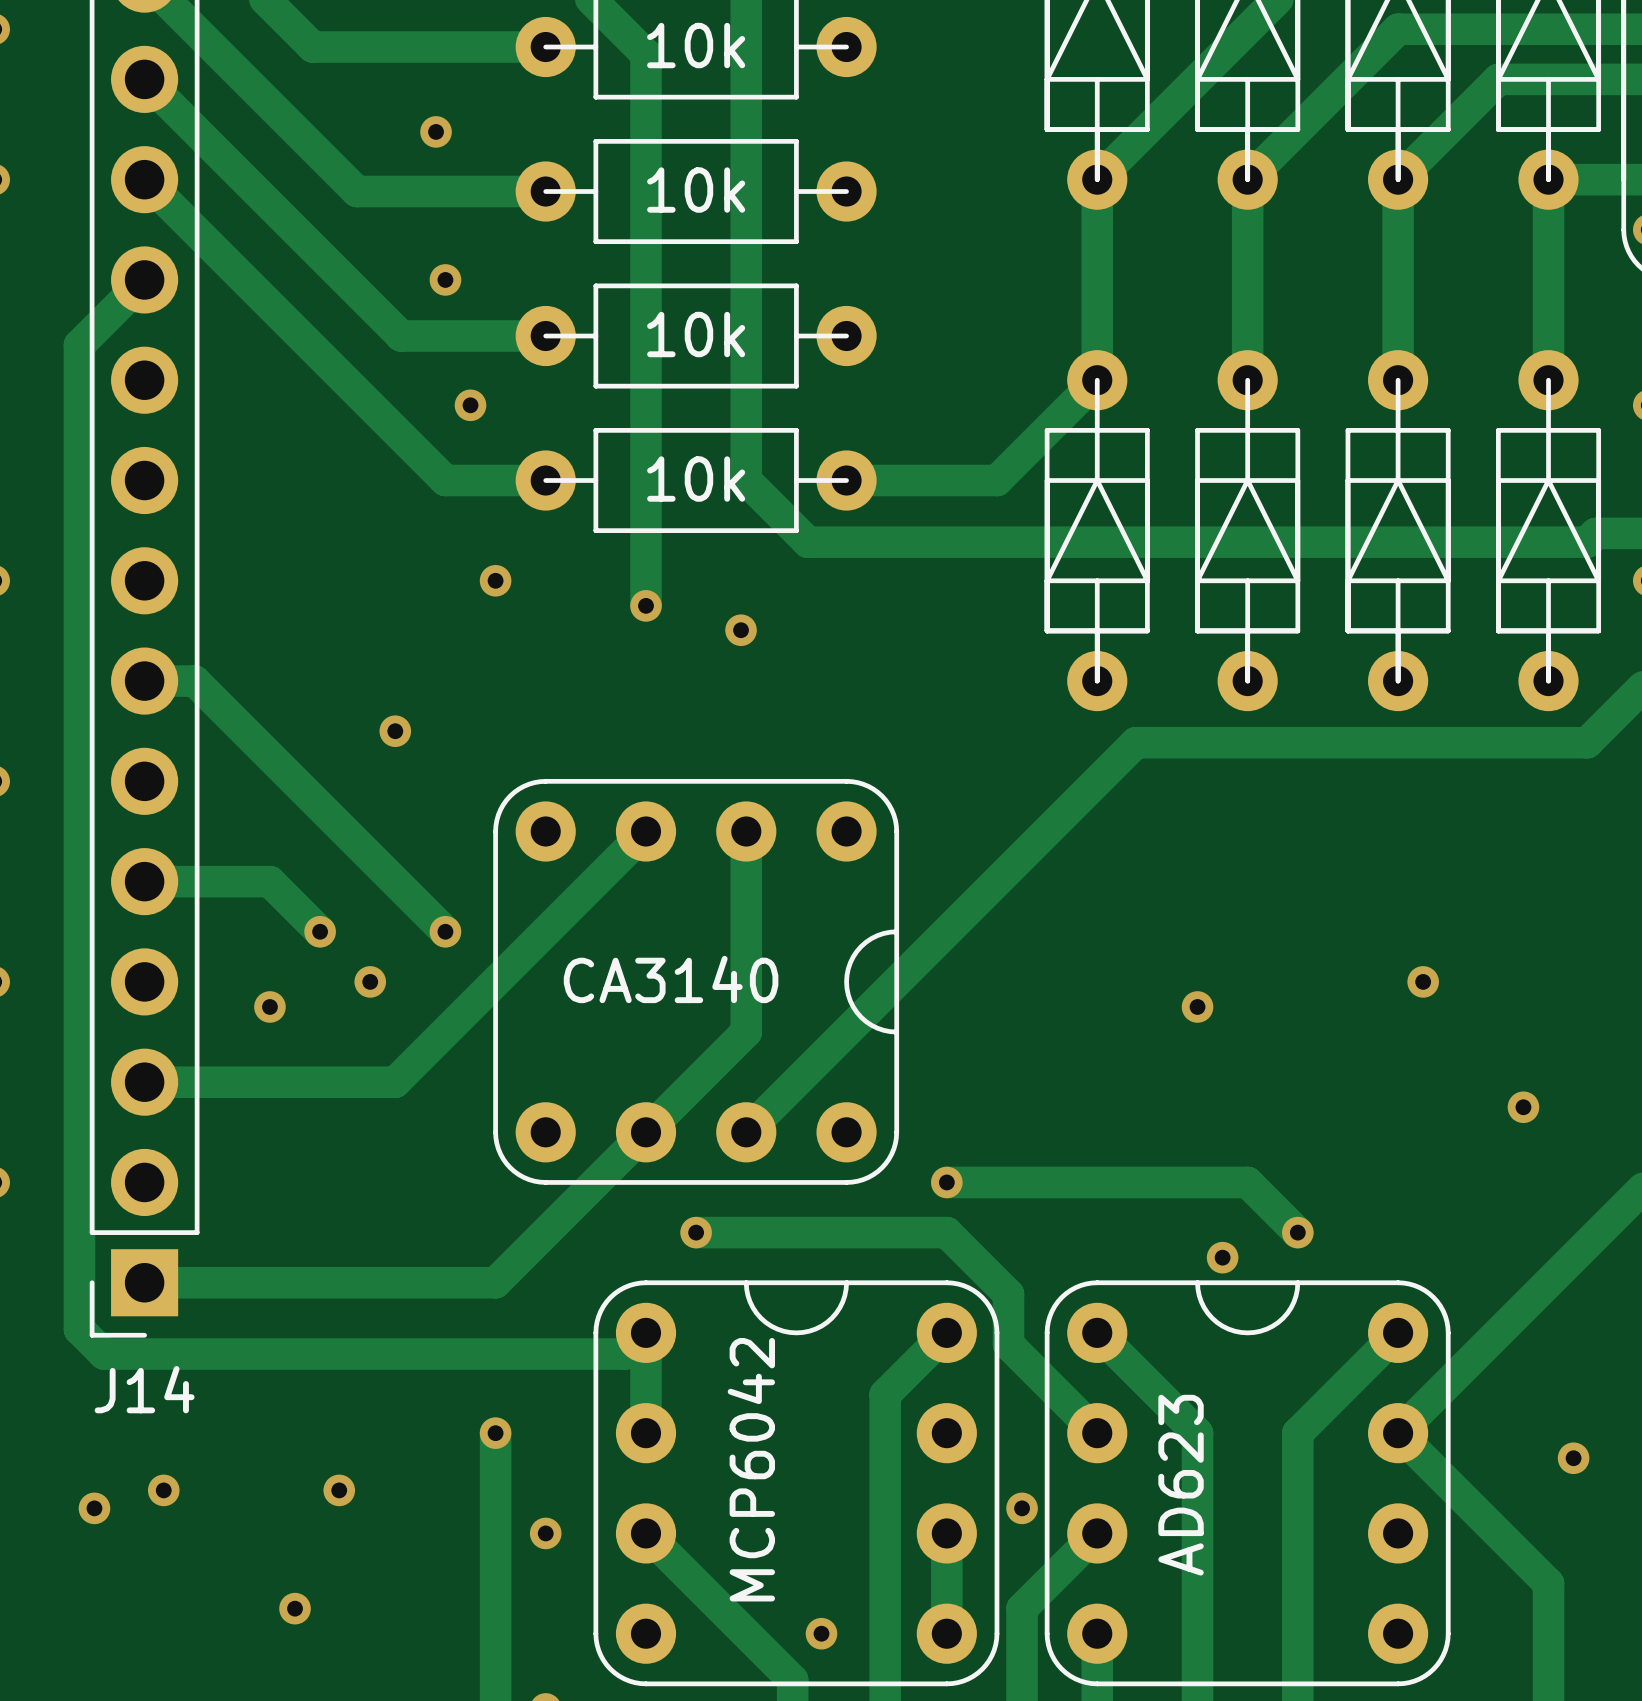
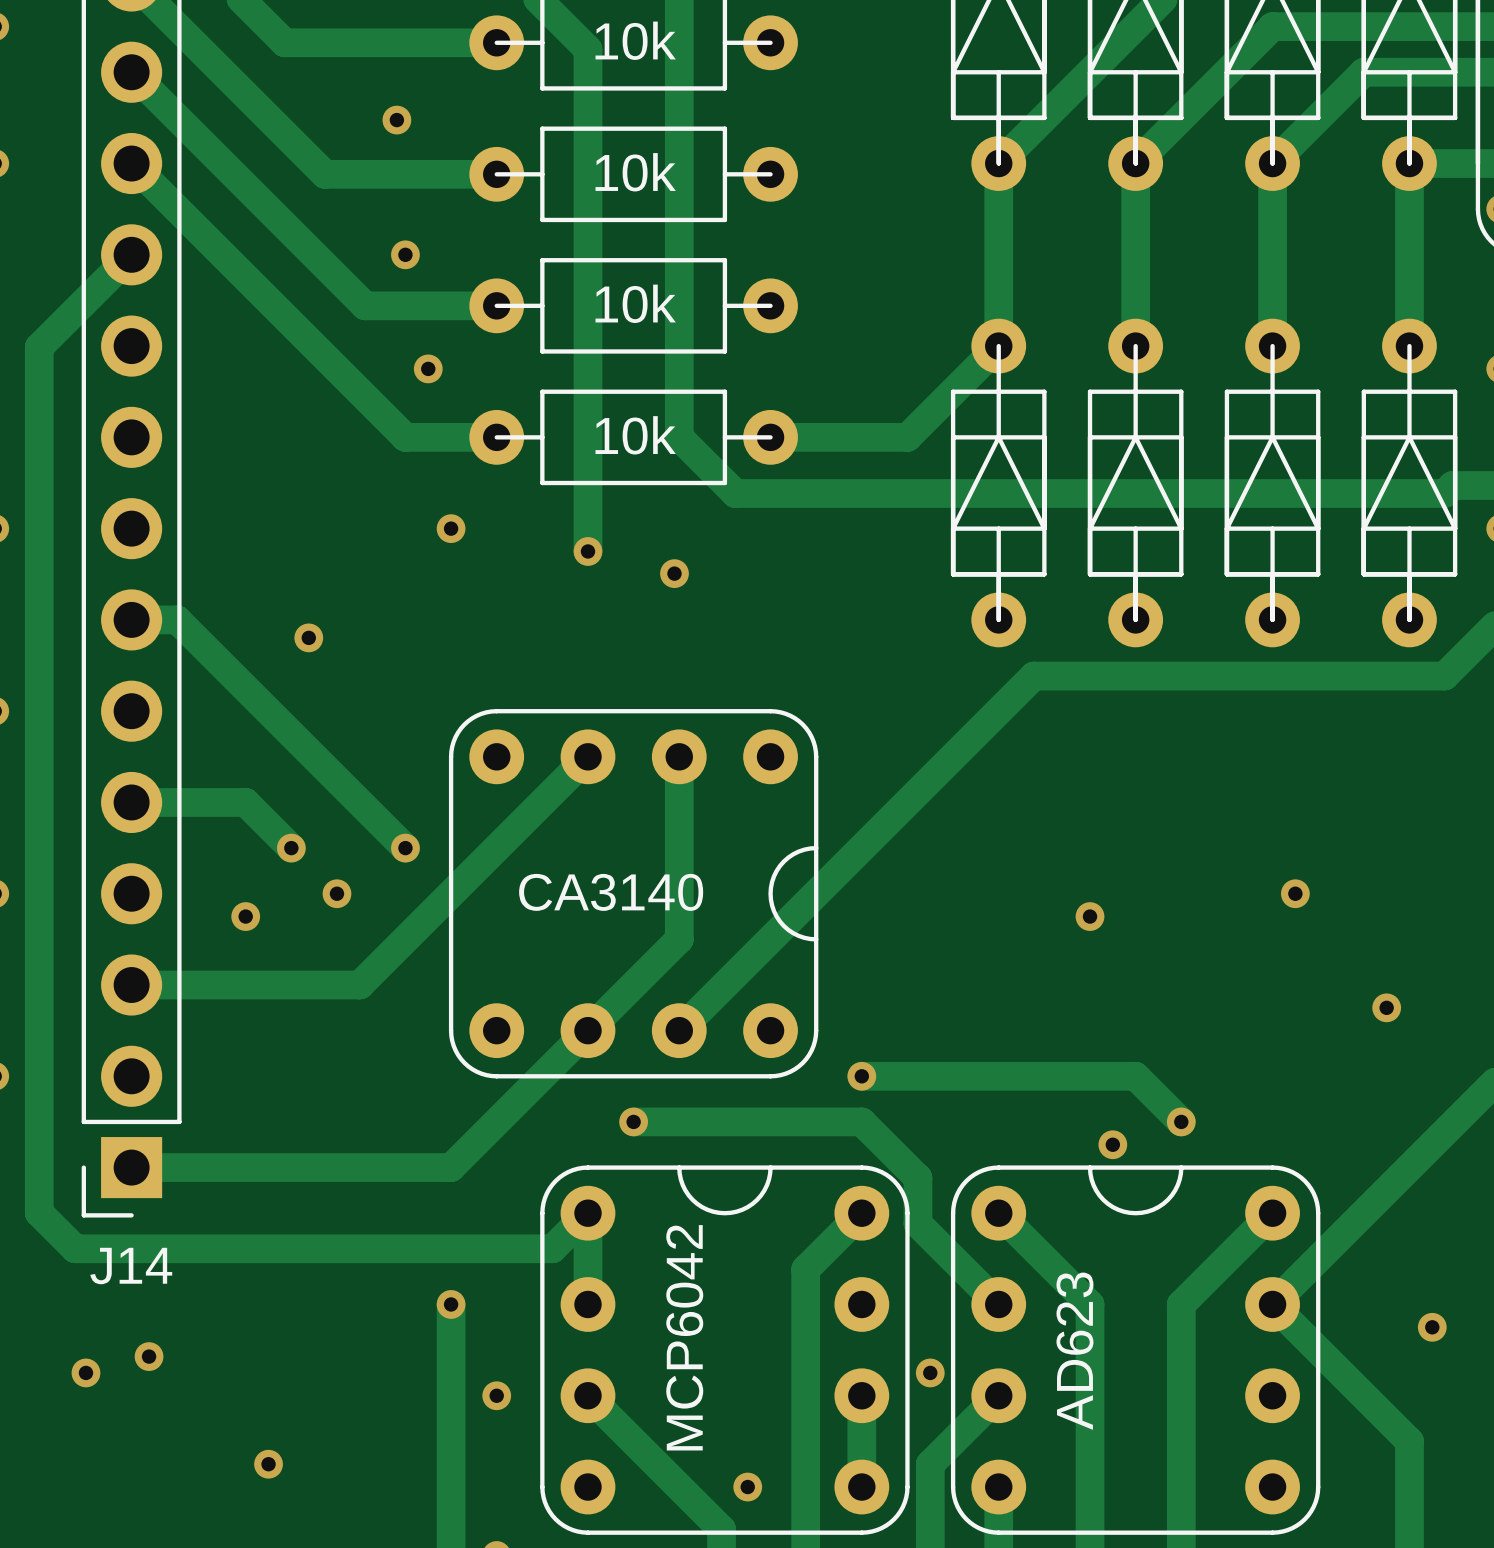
track: (79, 345) (79, 1329) (104, 1354) (624, 1354) -> (72, 314) (39, 347) (39, 1212) (75, 1248) (552, 1248) (568, 1232)
via position: (395, 731) -> (308, 637)
via: (339, 1490) -> none

